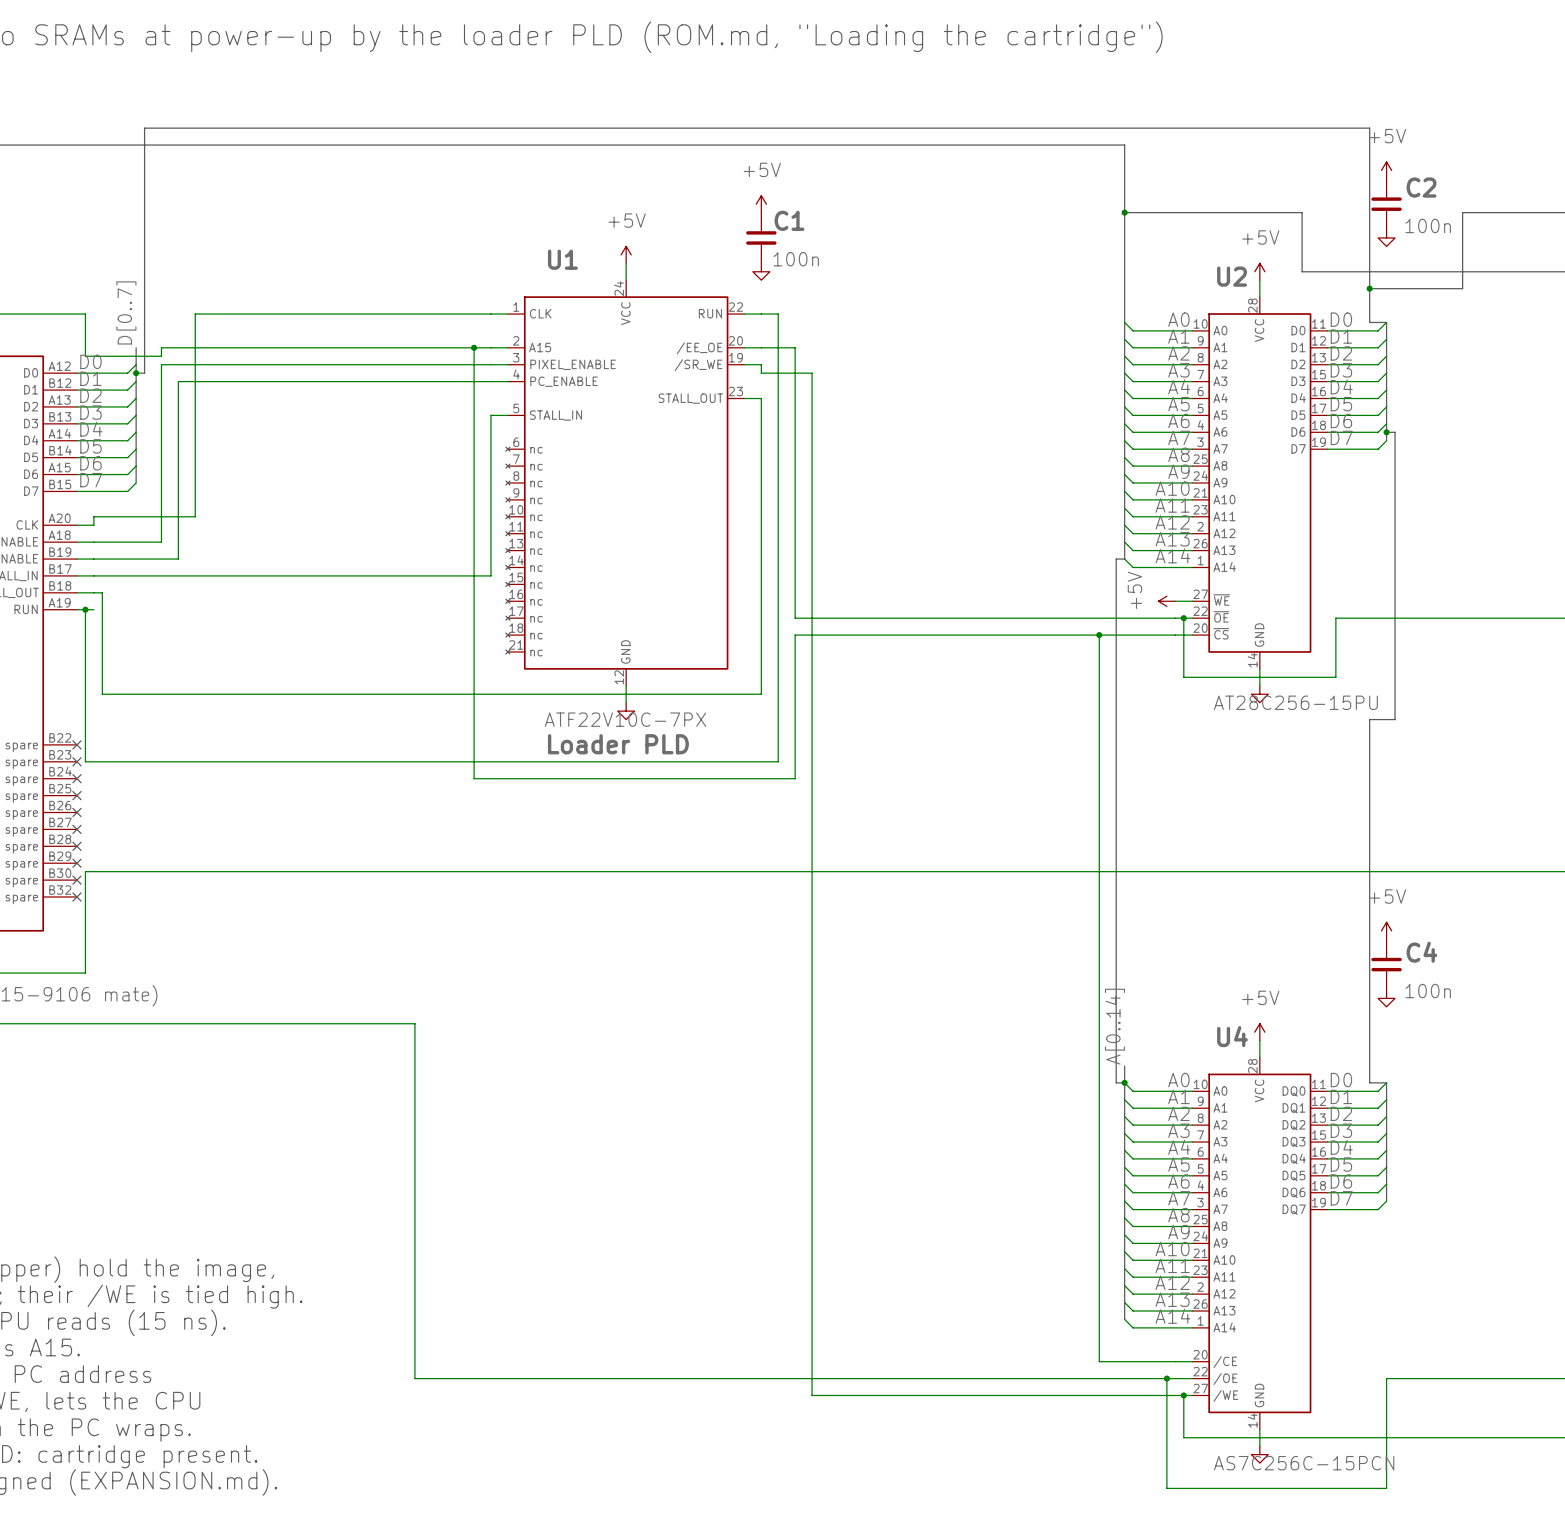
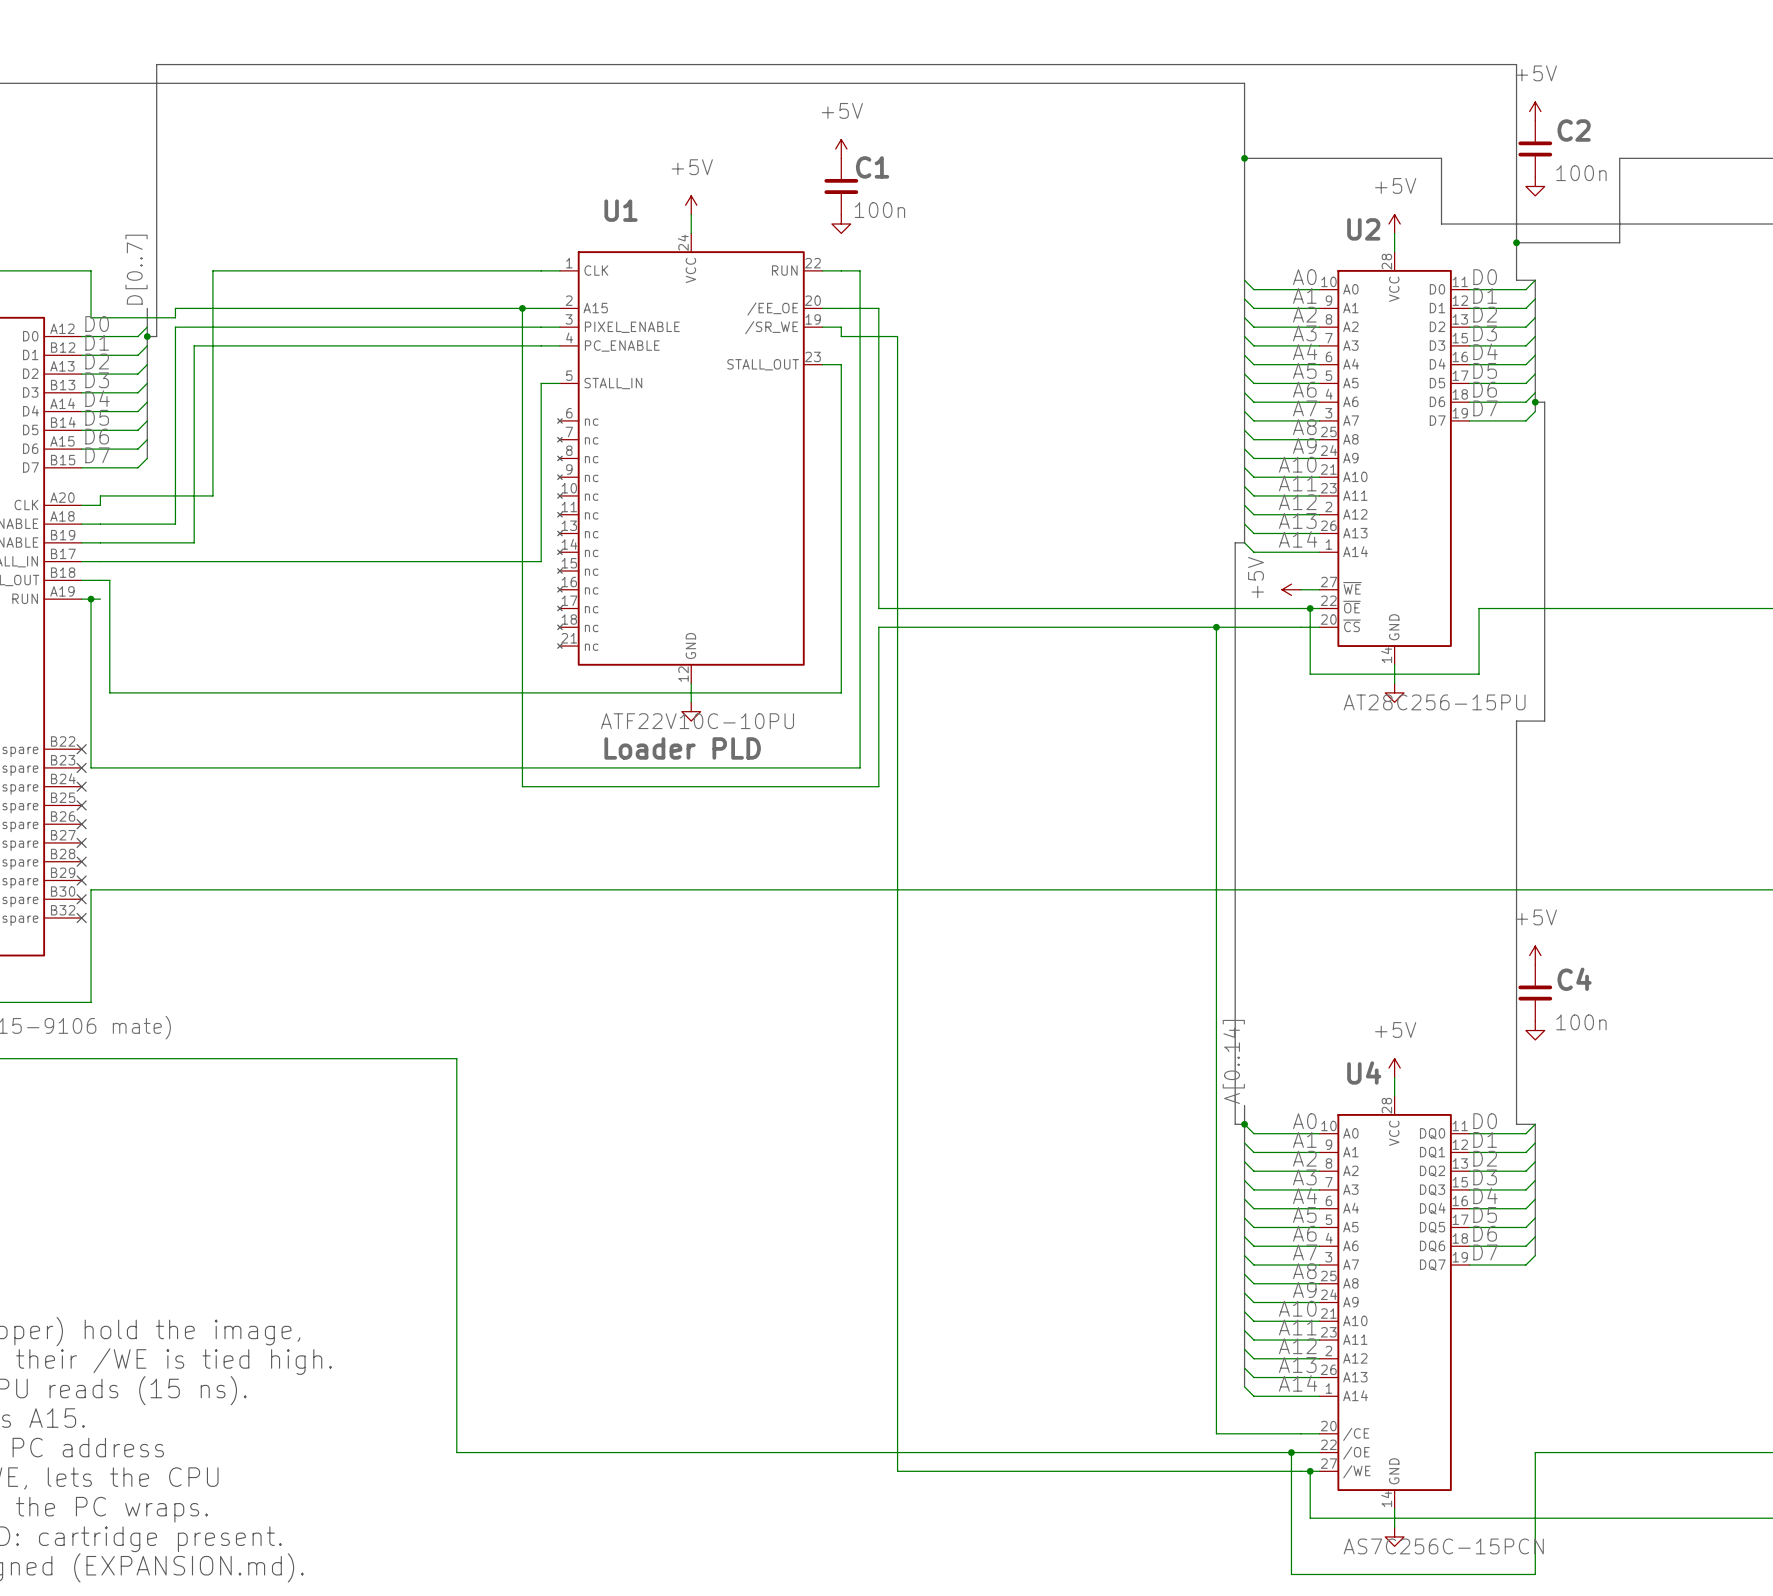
U1 value: ATF22V10C-7PX (625, 719) -> ATF22V10C-10PU (697, 721)

